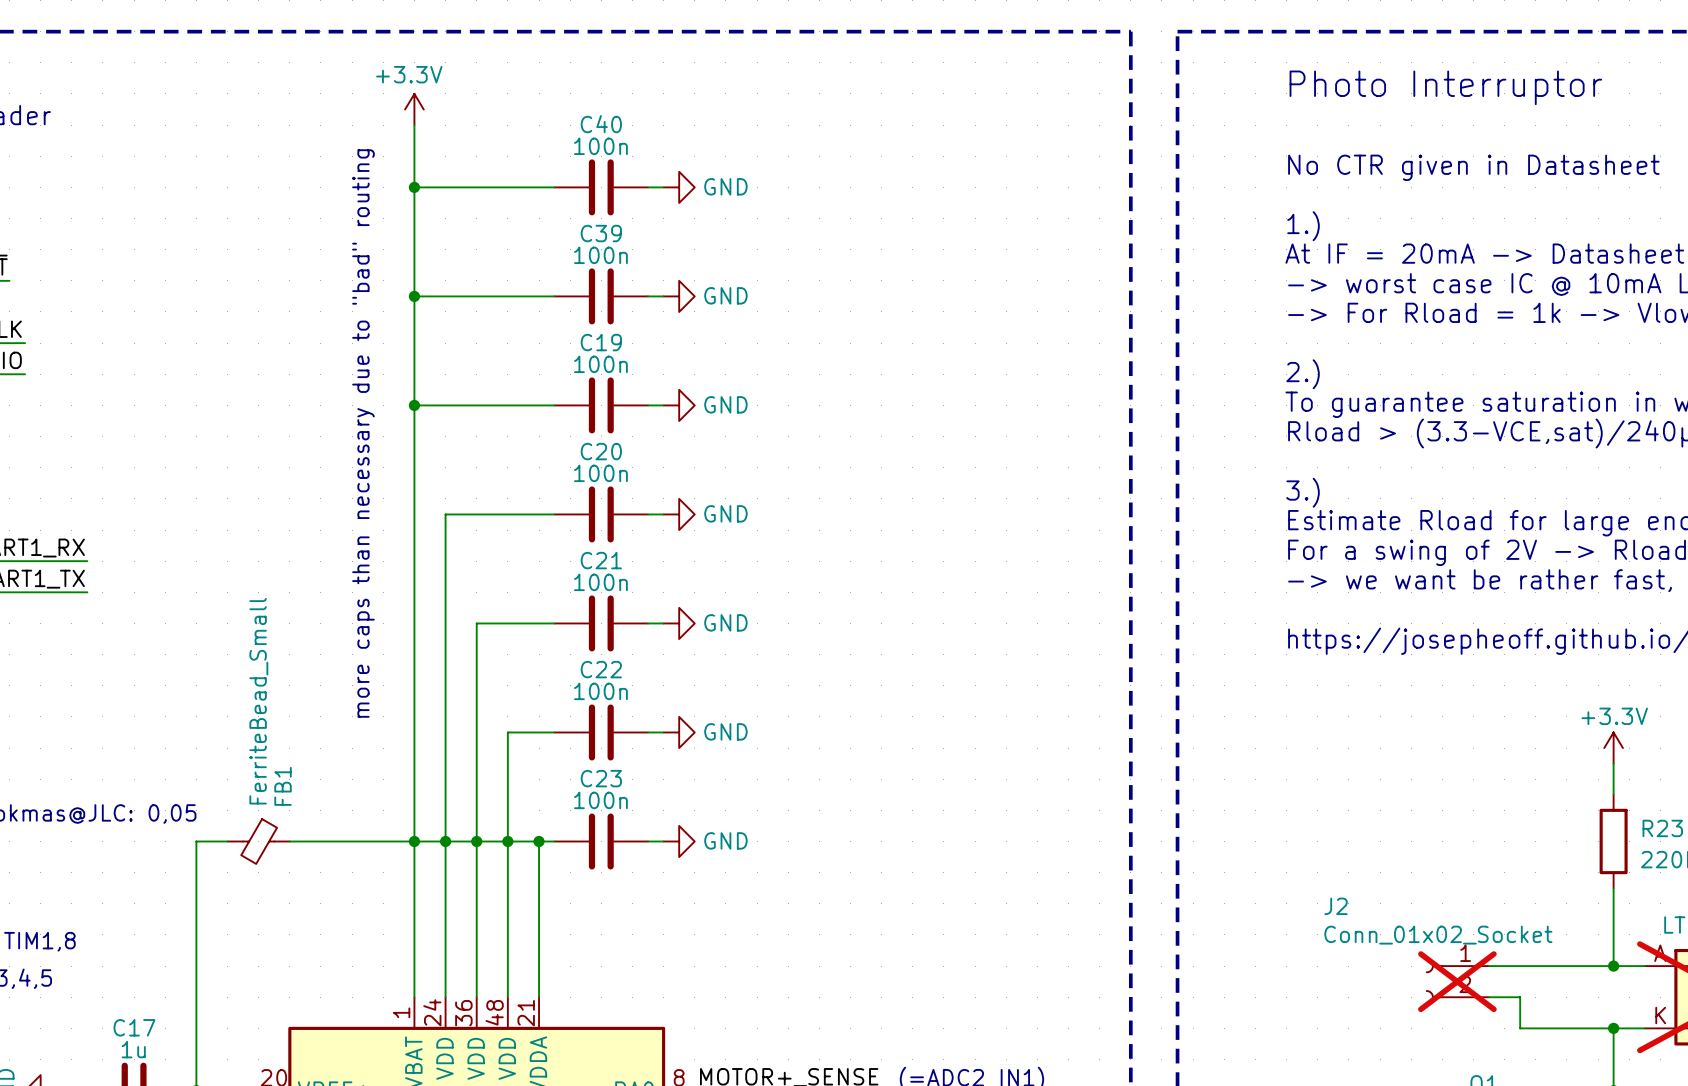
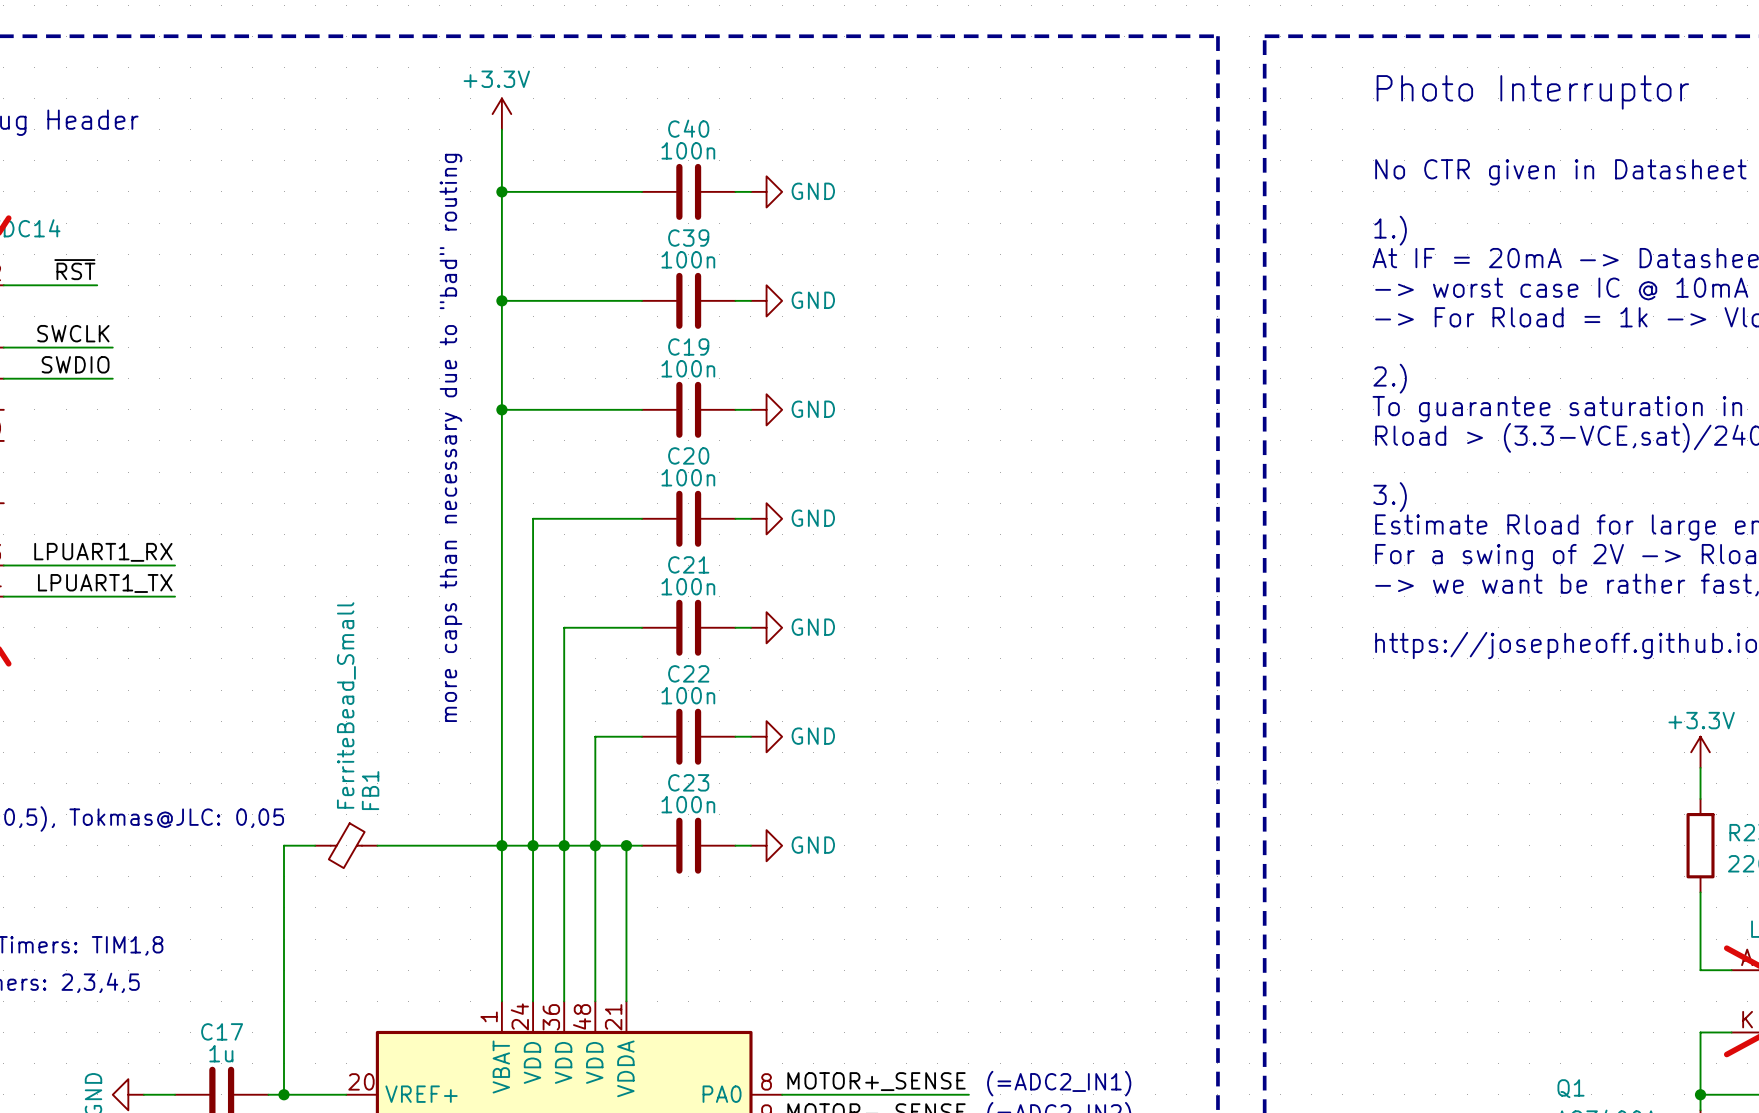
wire: (1489, 966) (1613, 966) -> none
junction: (1613, 966) -> none
J2: Conn_01x02_Socket (1457, 981) -> none
wire: (1489, 997) (1520, 997) (1520, 1028) (1613, 1028) -> none
junction: (1613, 1028) -> none

